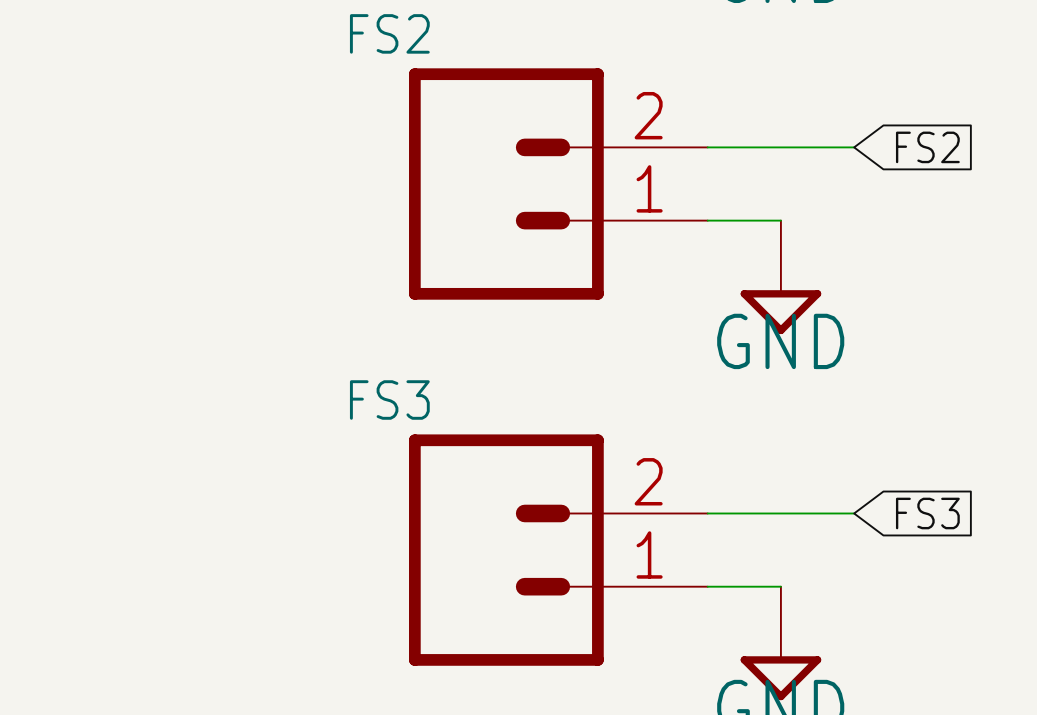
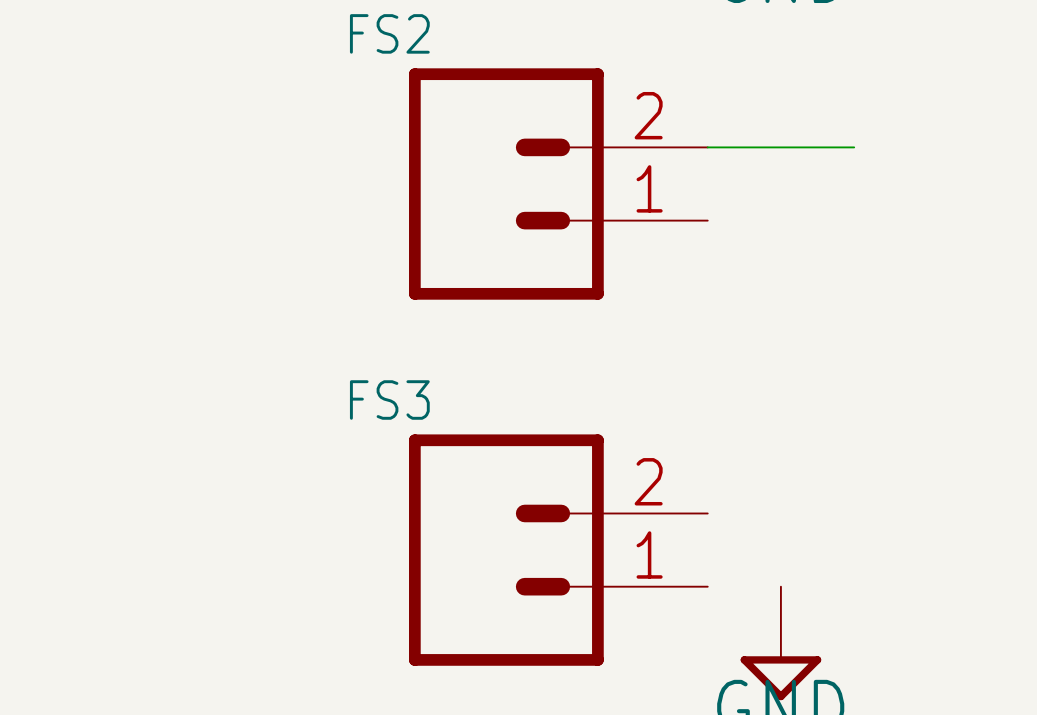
global label: FS2 (927, 147) -> none
wire: (707, 220) (780, 220) -> none
power symbol: GND (780, 277) -> none
wire: (707, 513) (854, 513) -> none
global label: FS3 (927, 513) -> none
wire: (707, 586) (780, 586) -> none

